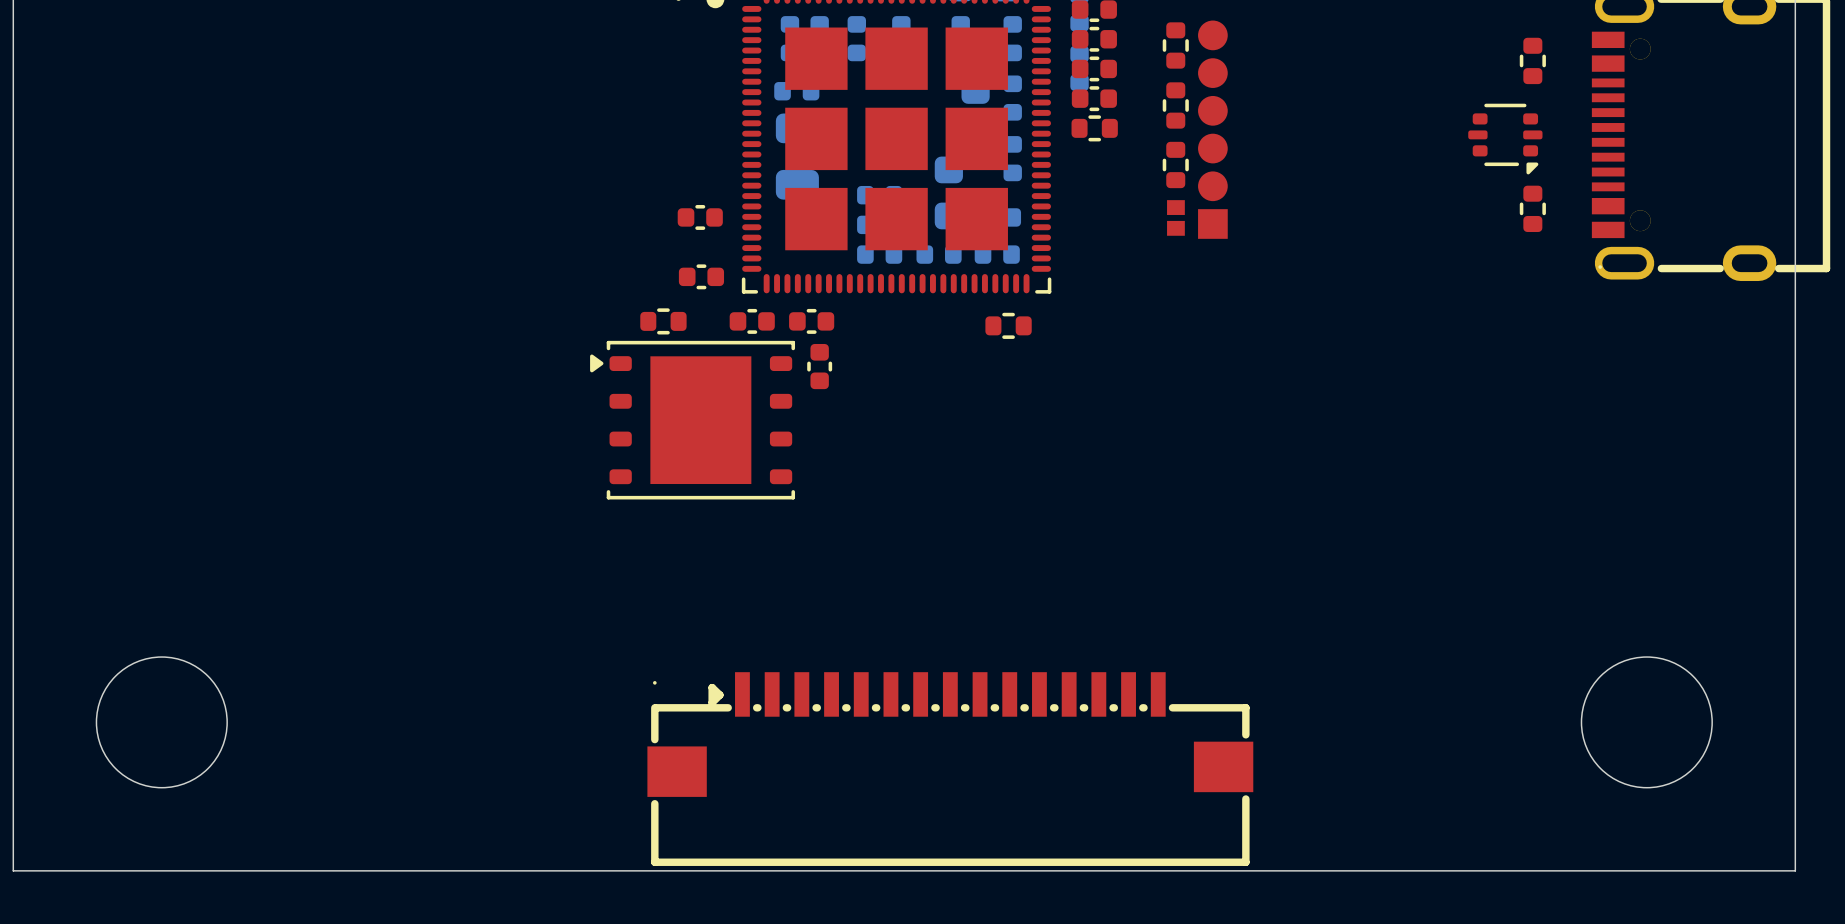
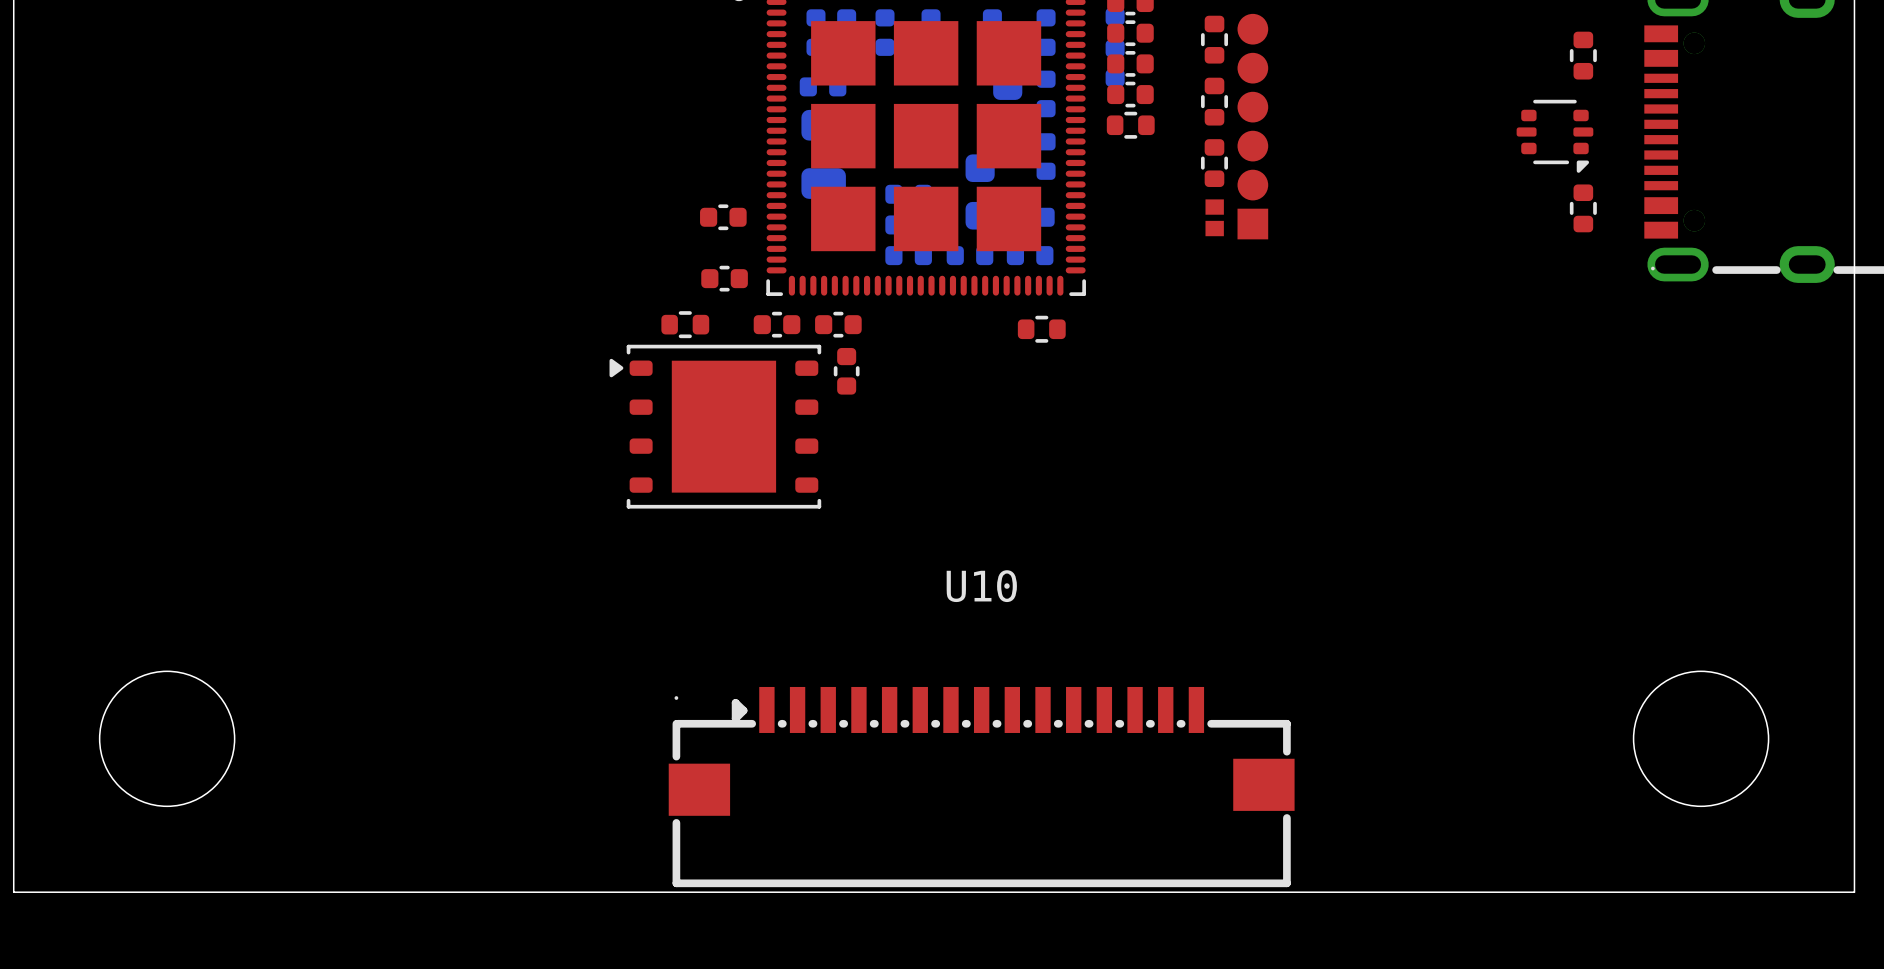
U10 name: none -> U10 (981, 586)

